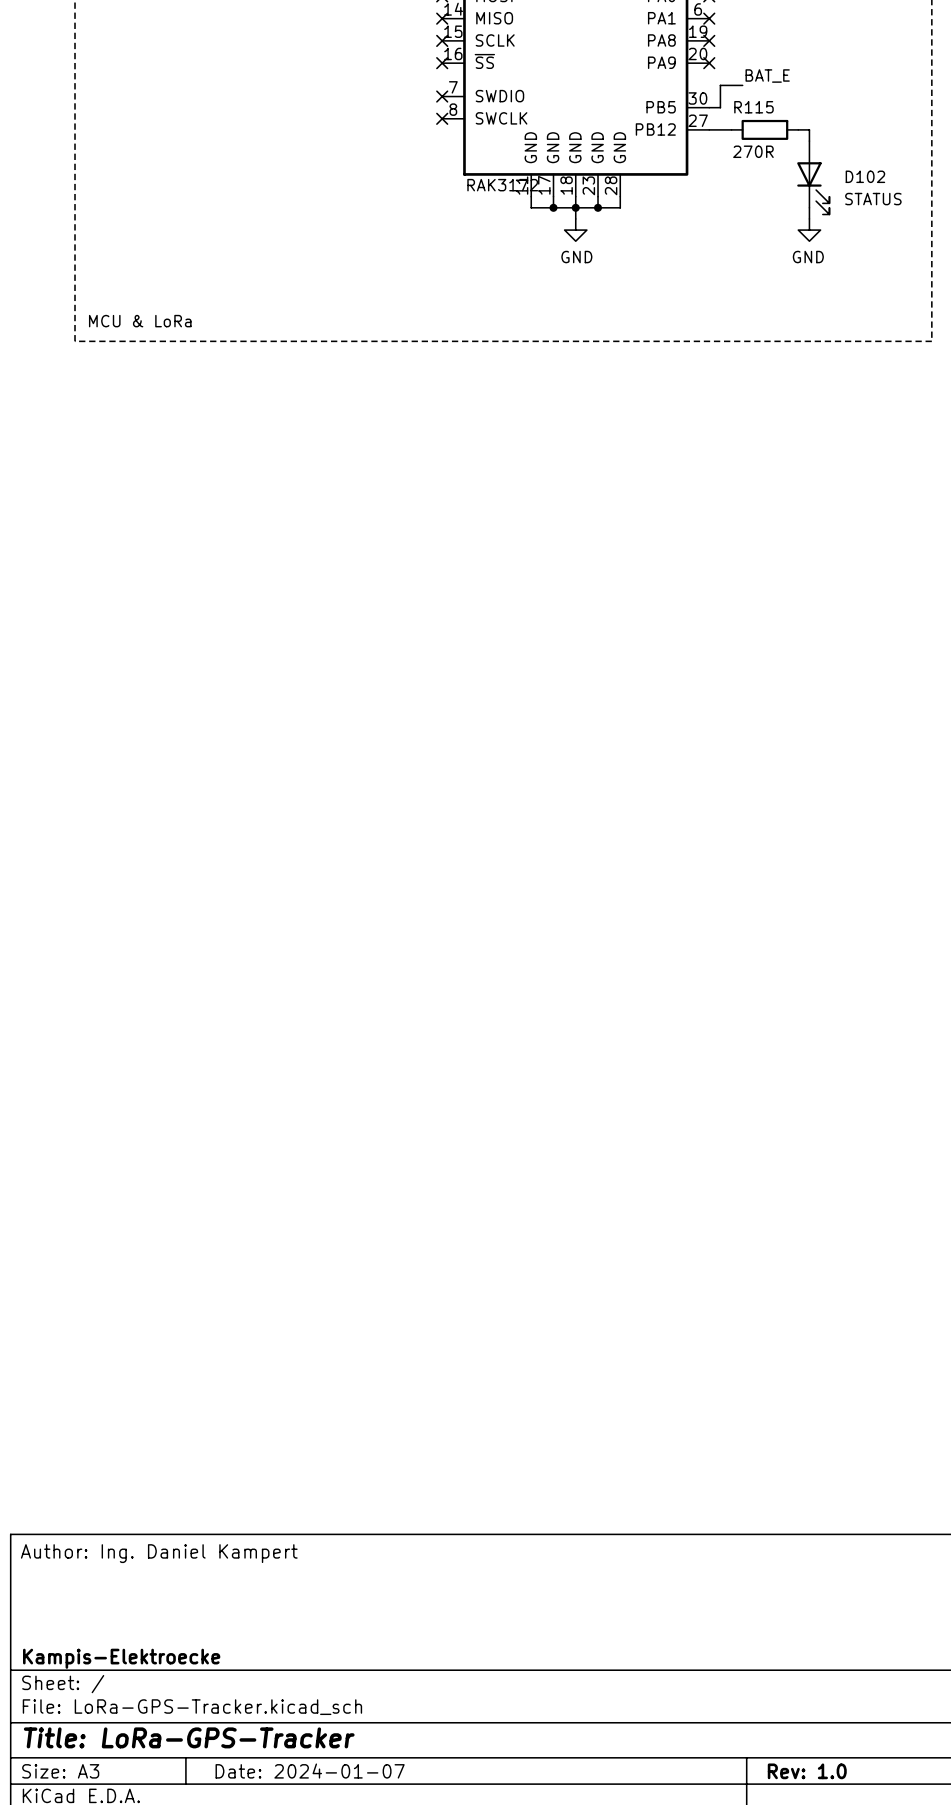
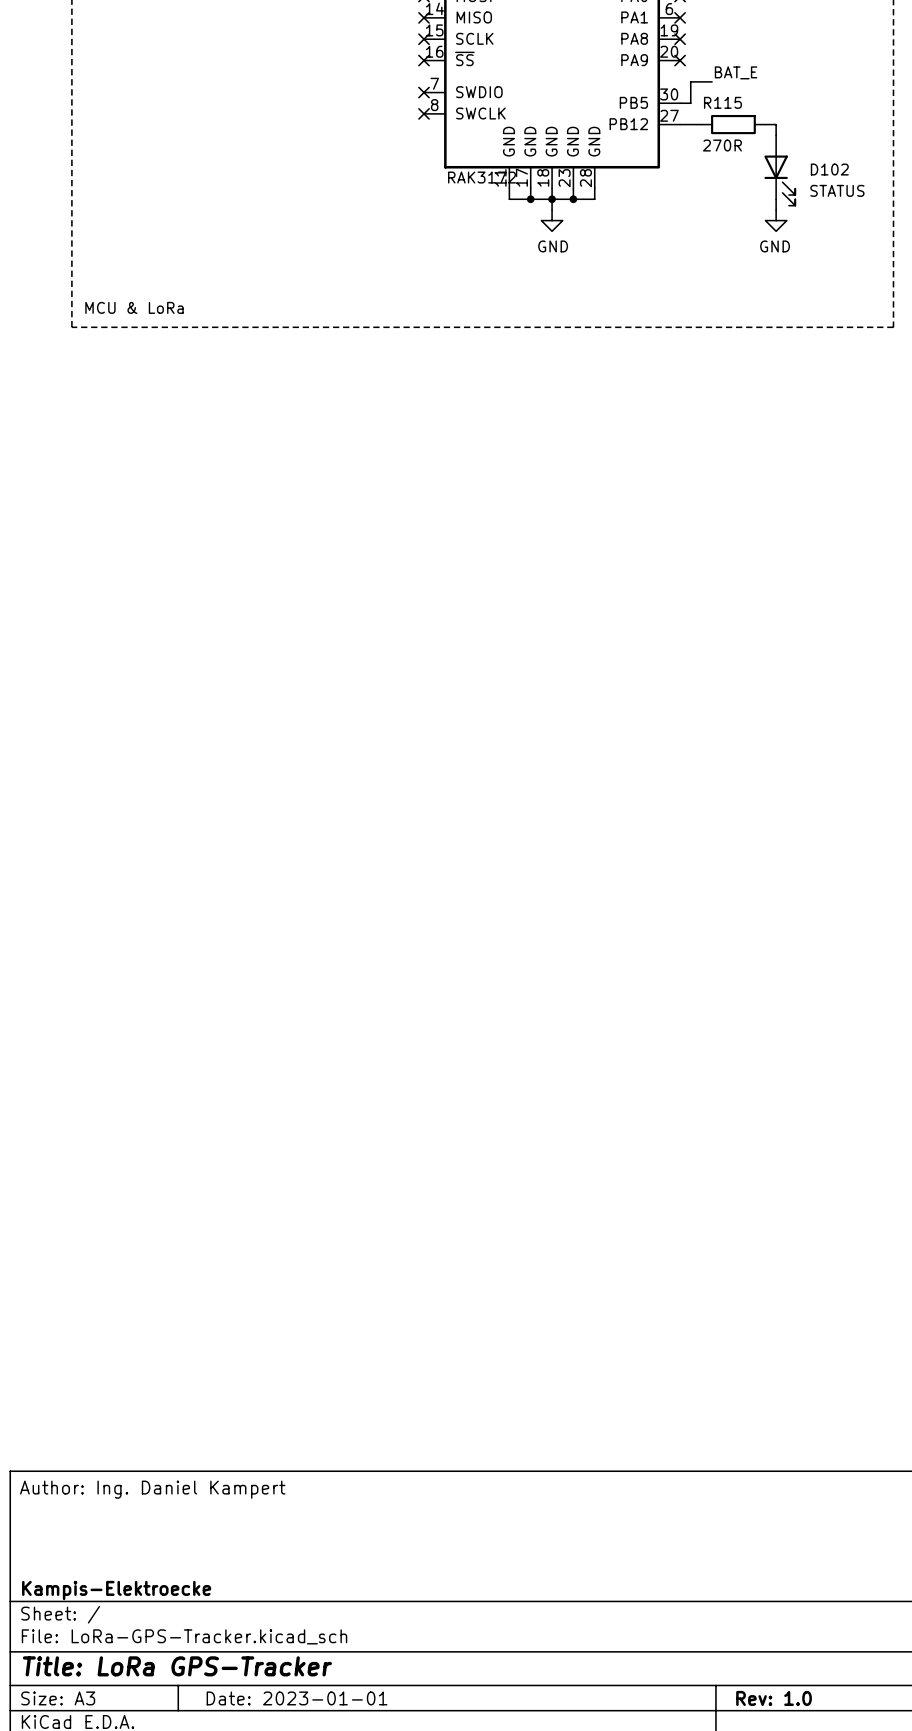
title block: Title: LoRa-GPS-Tracker (189, 1737) -> Title: LoRa GPS-Tracker (177, 1666)
title block: Date: 2024-01-07 (310, 1771) -> Date: 2023-01-01 (297, 1698)

